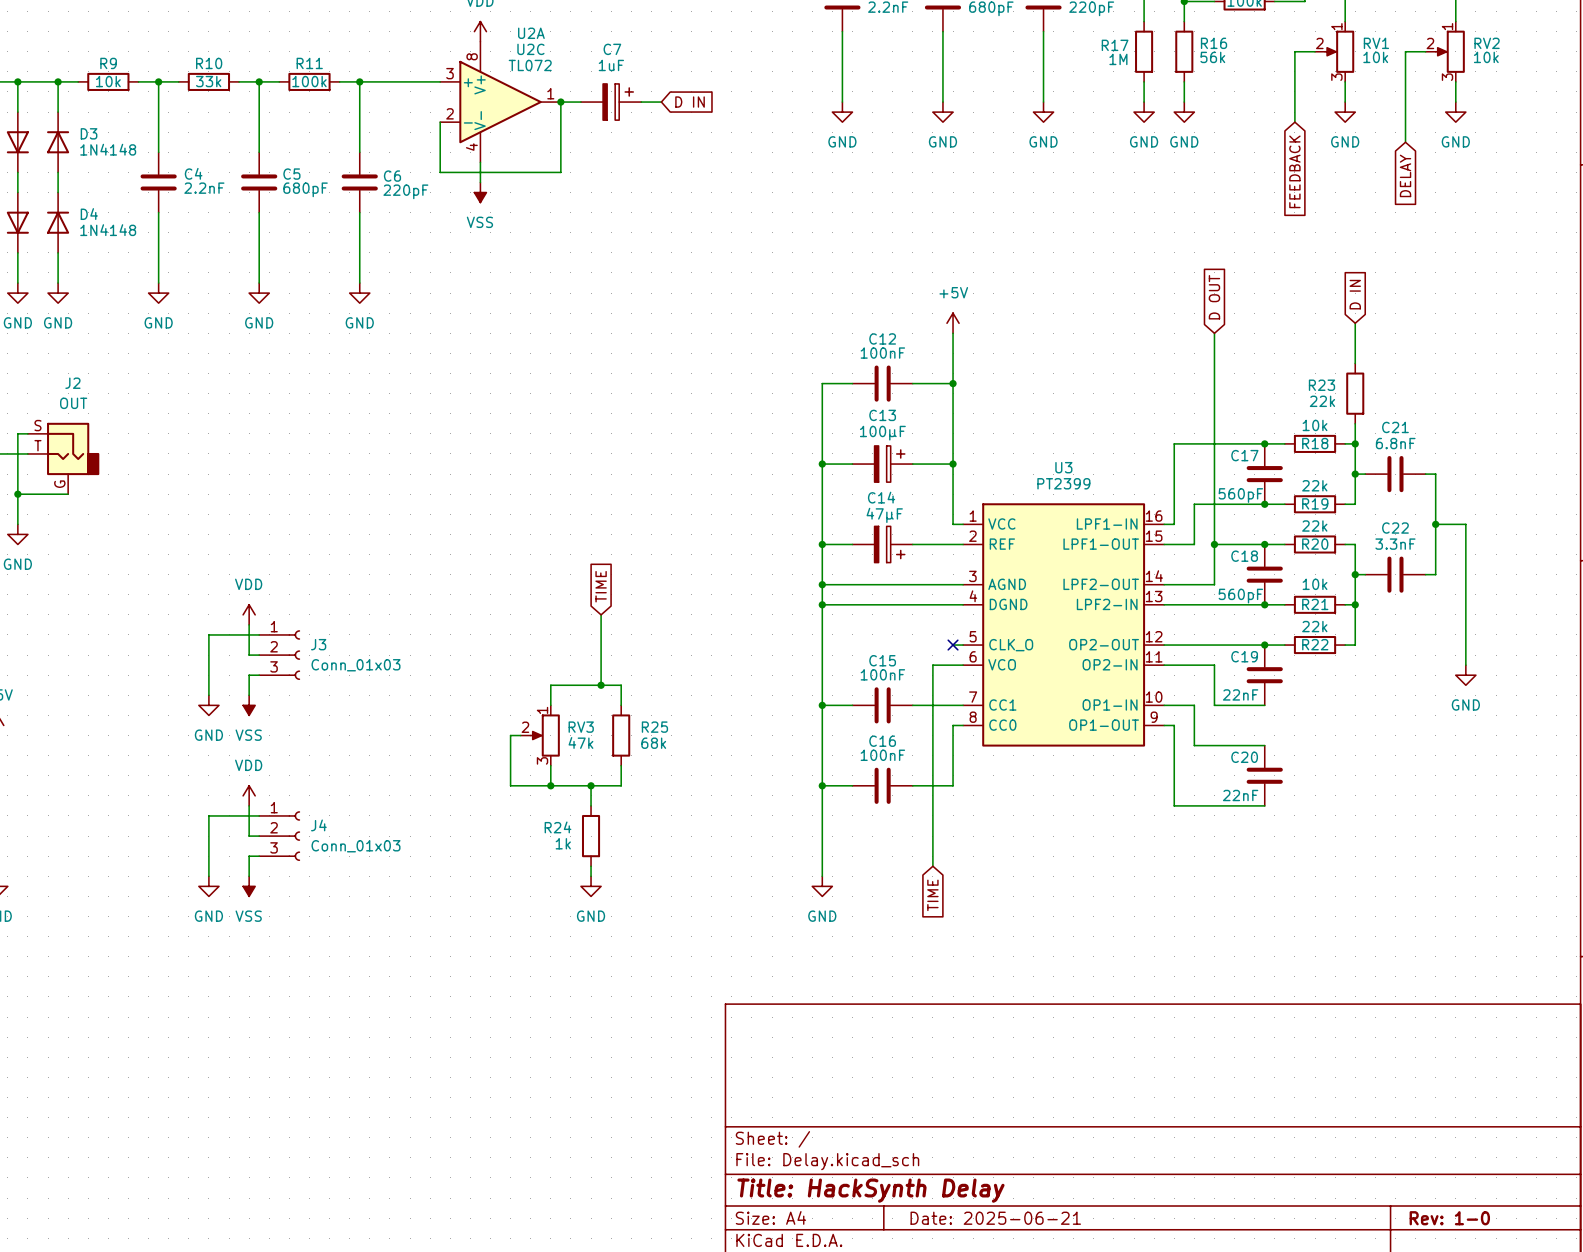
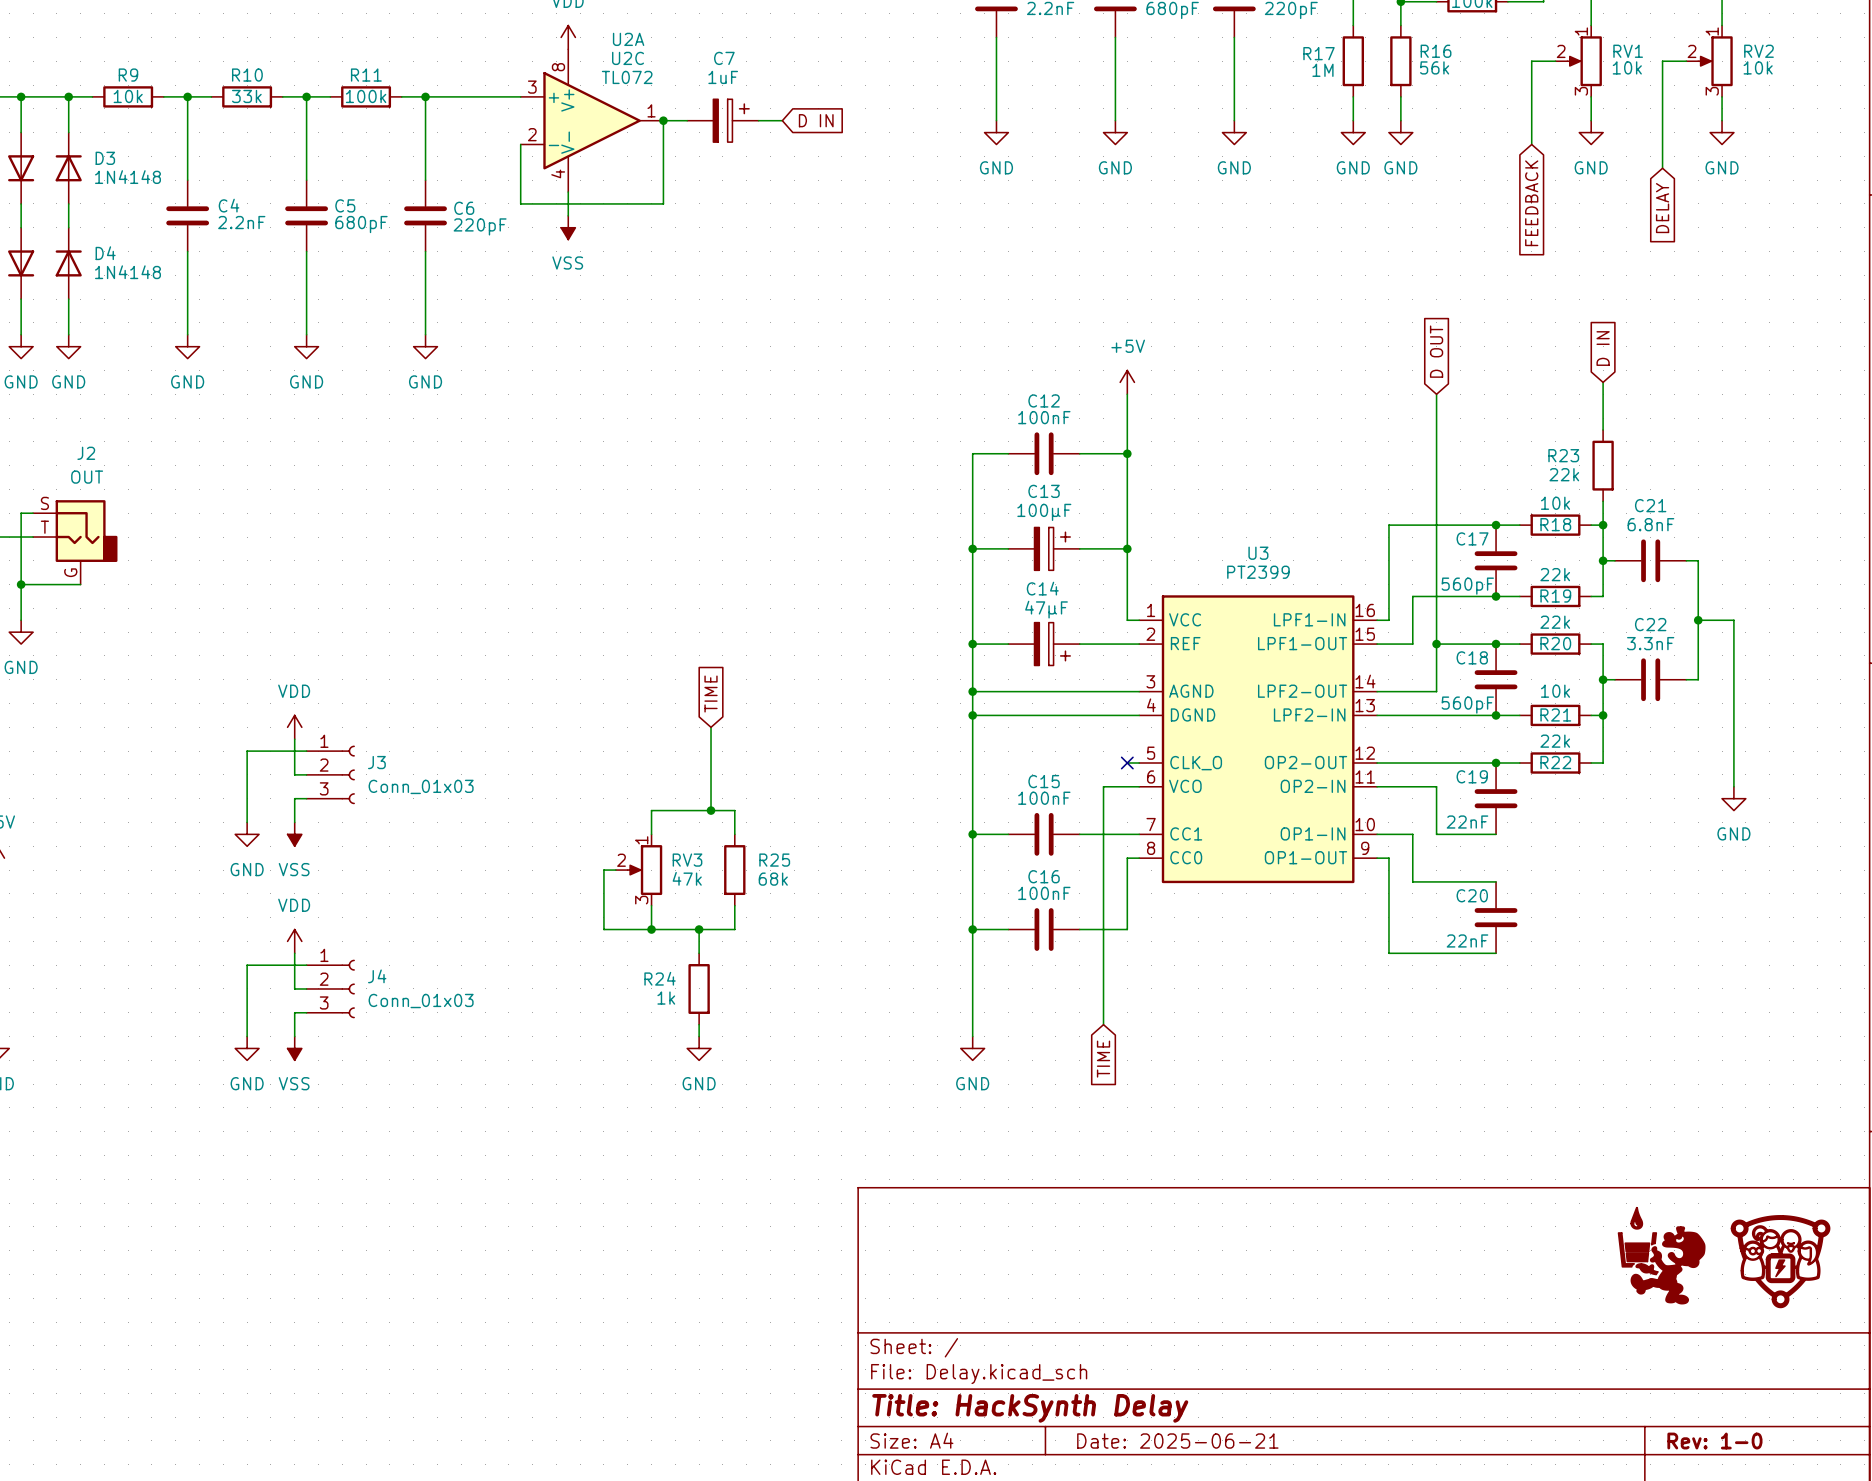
part: none -> (1661, 1255)
part: none -> (1780, 1261)

